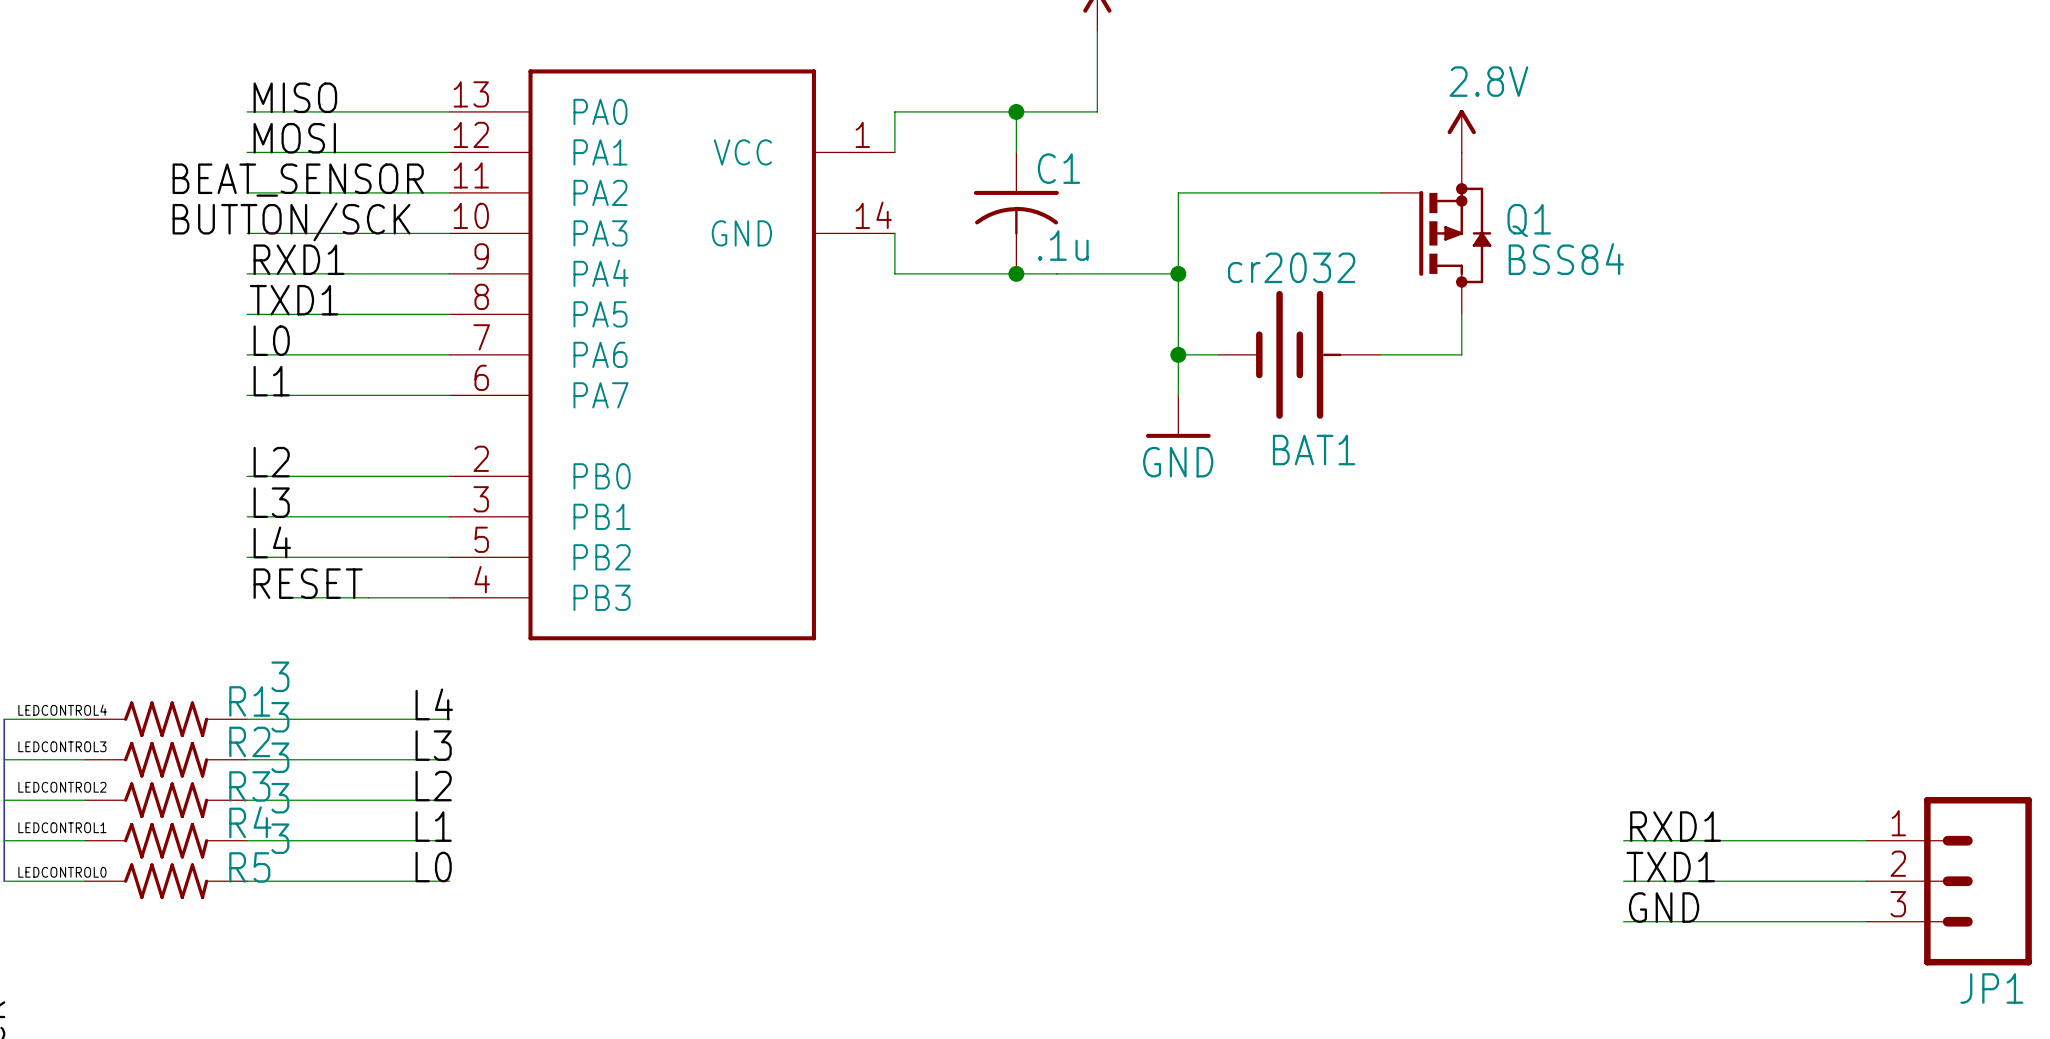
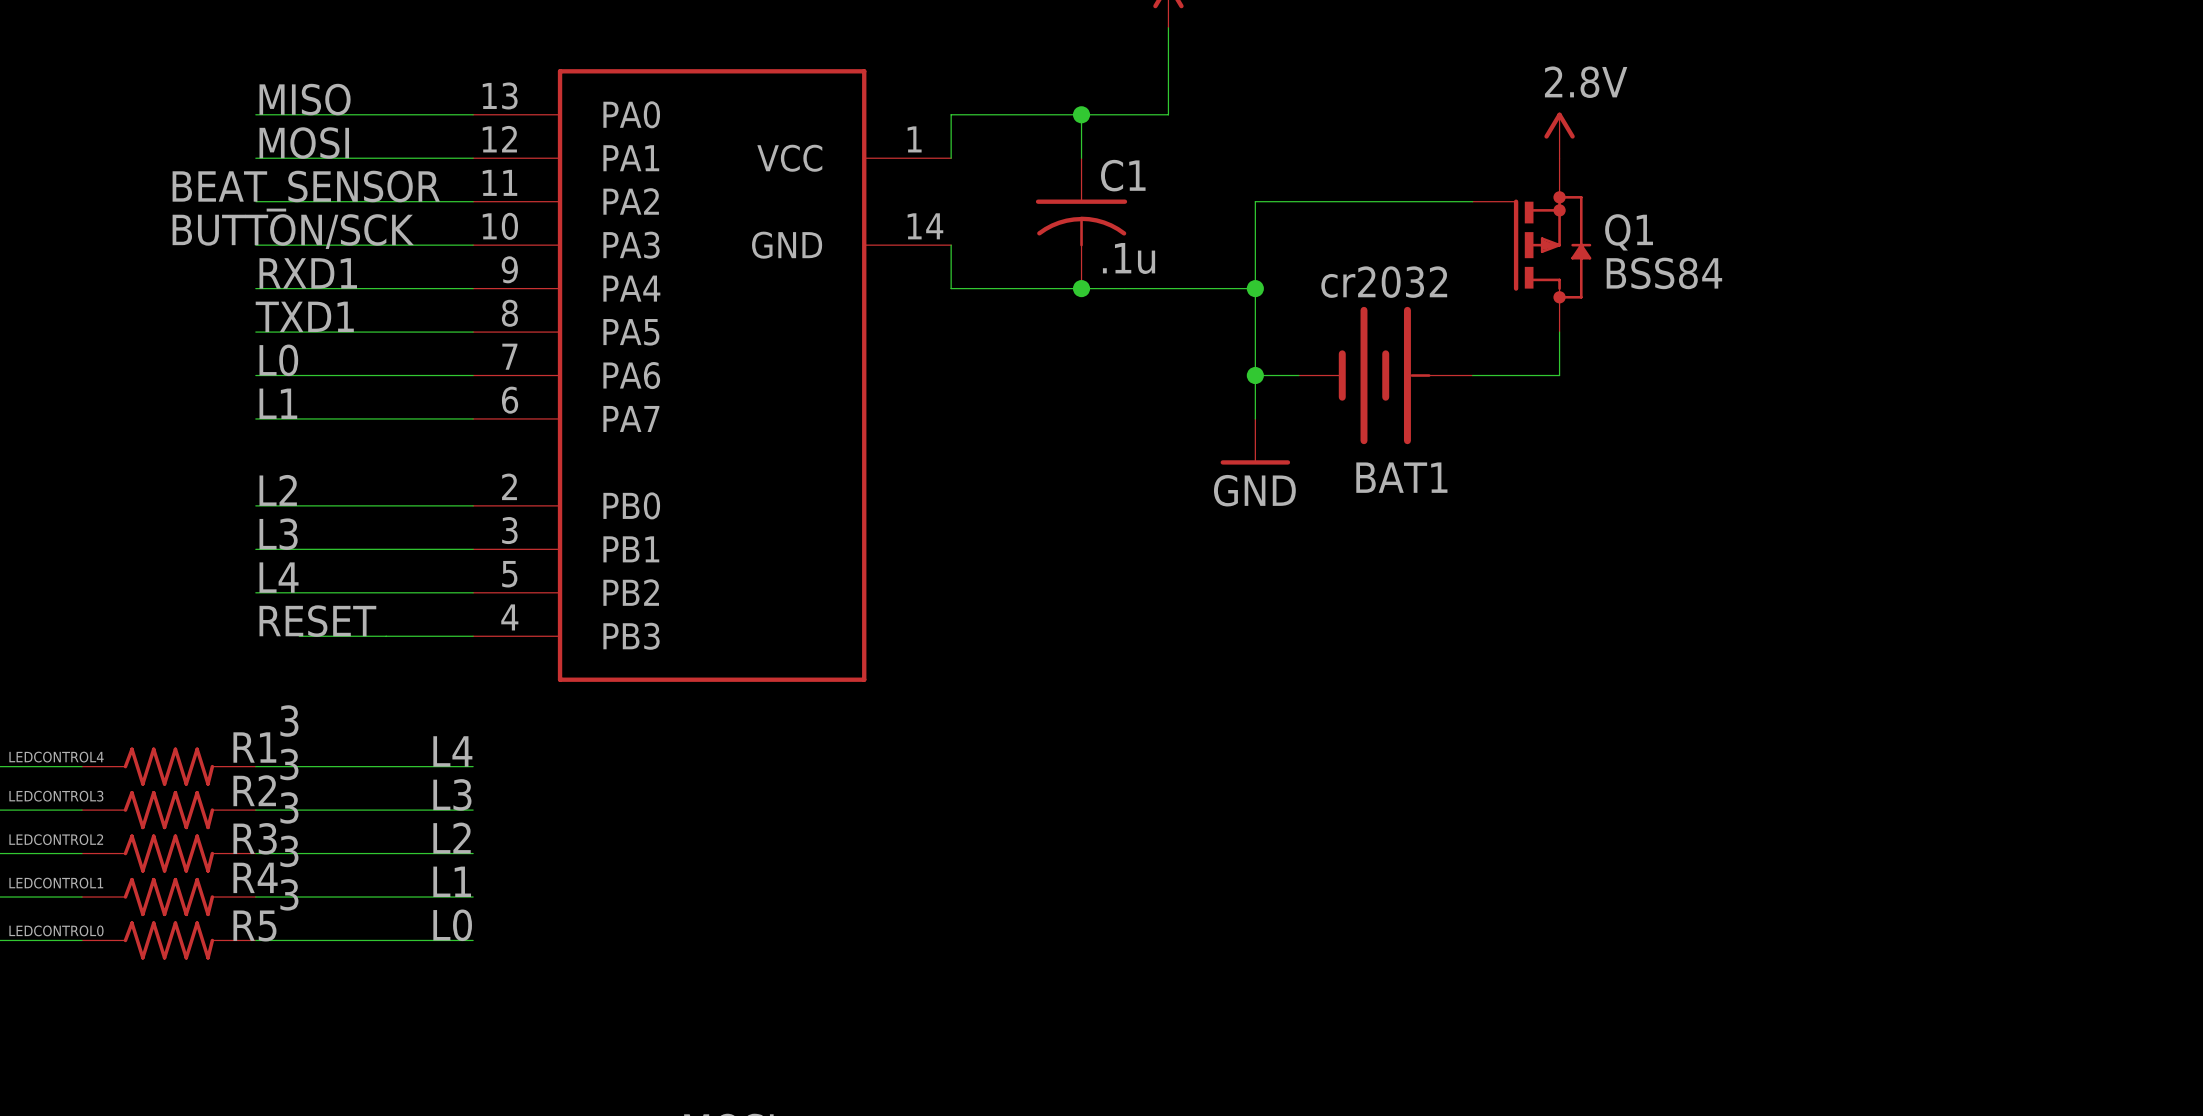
label: RXD1 (1675, 826) -> none
wire: (1623, 840) (1866, 840) -> none
label: TXD1 (1670, 867) -> none
wire: (1623, 881) (1866, 881) -> none
JP1: (1949, 881) -> none
label: GND (1664, 907) -> none
wire: (1623, 921) (1866, 921) -> none

